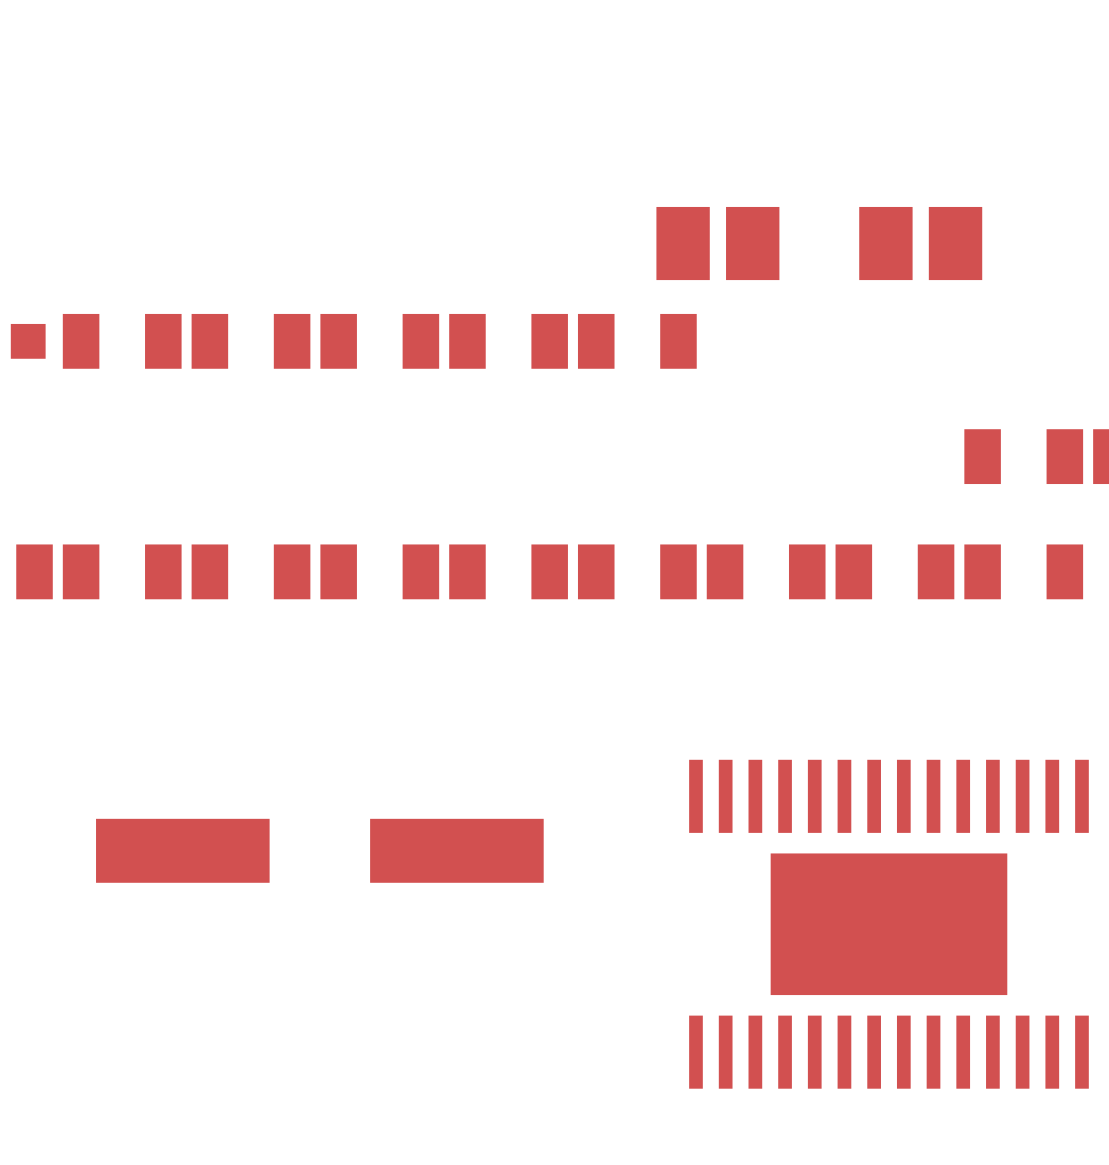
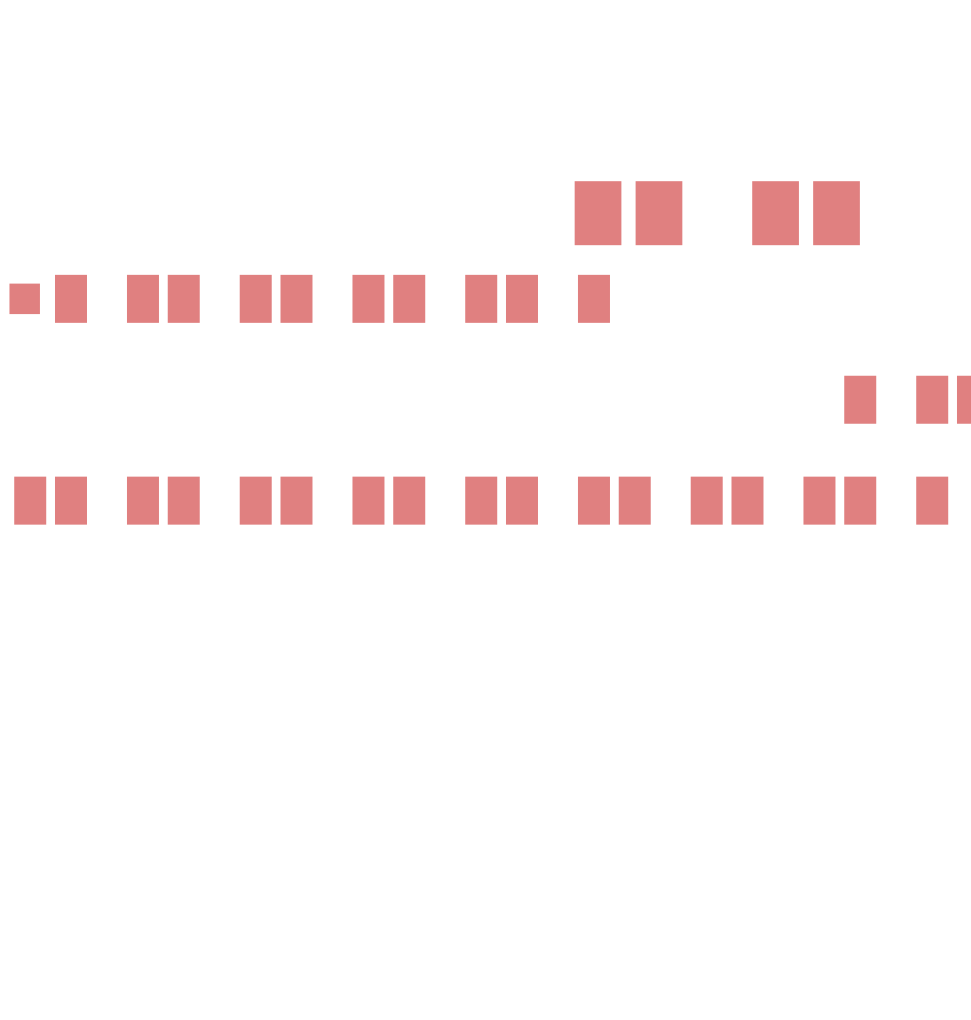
part: (319, 850) -> none
part: (888, 924) -> none

